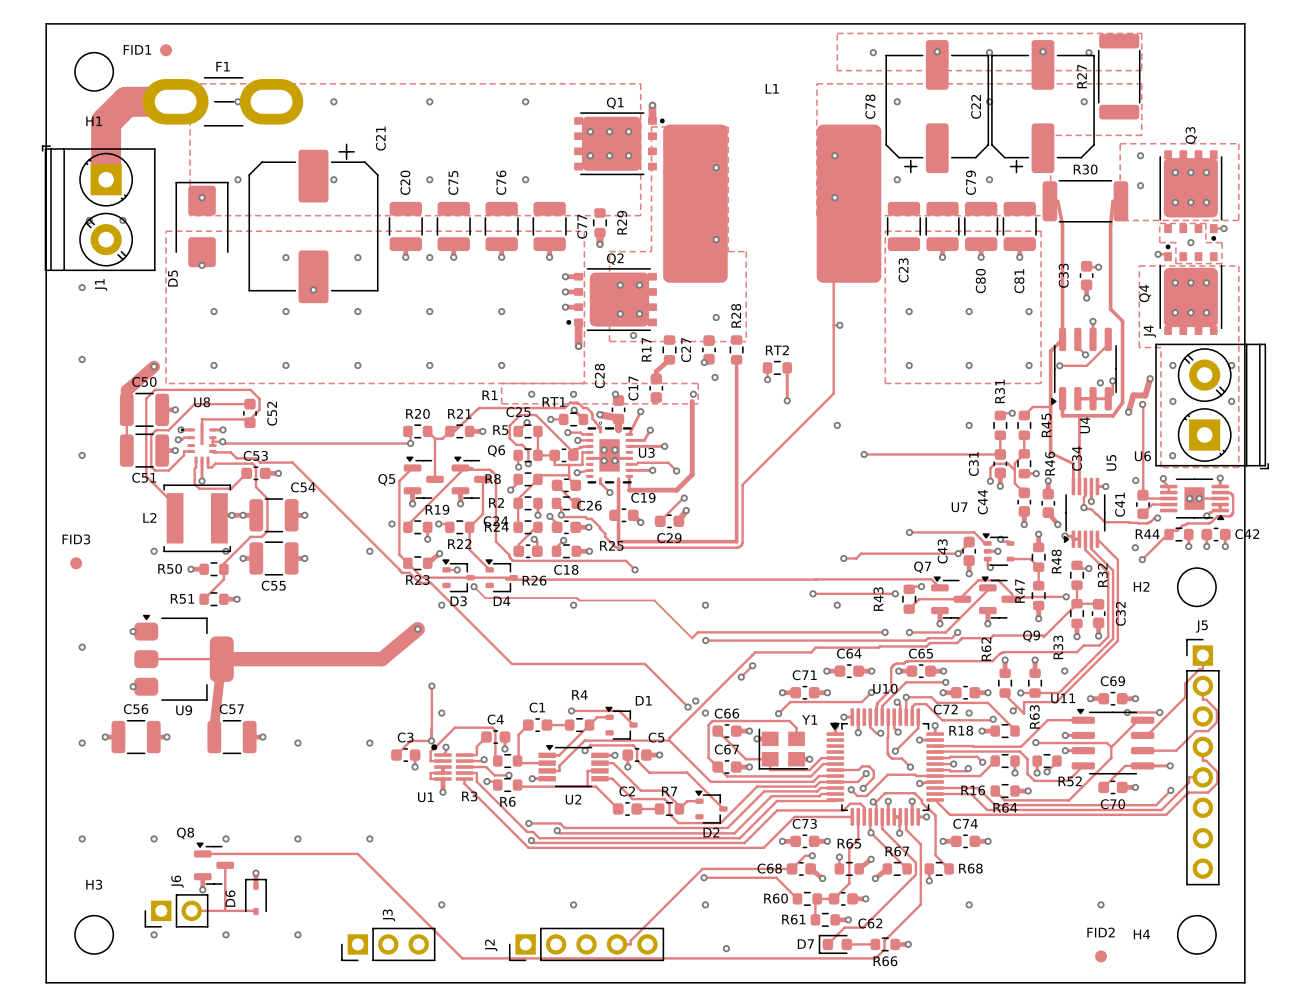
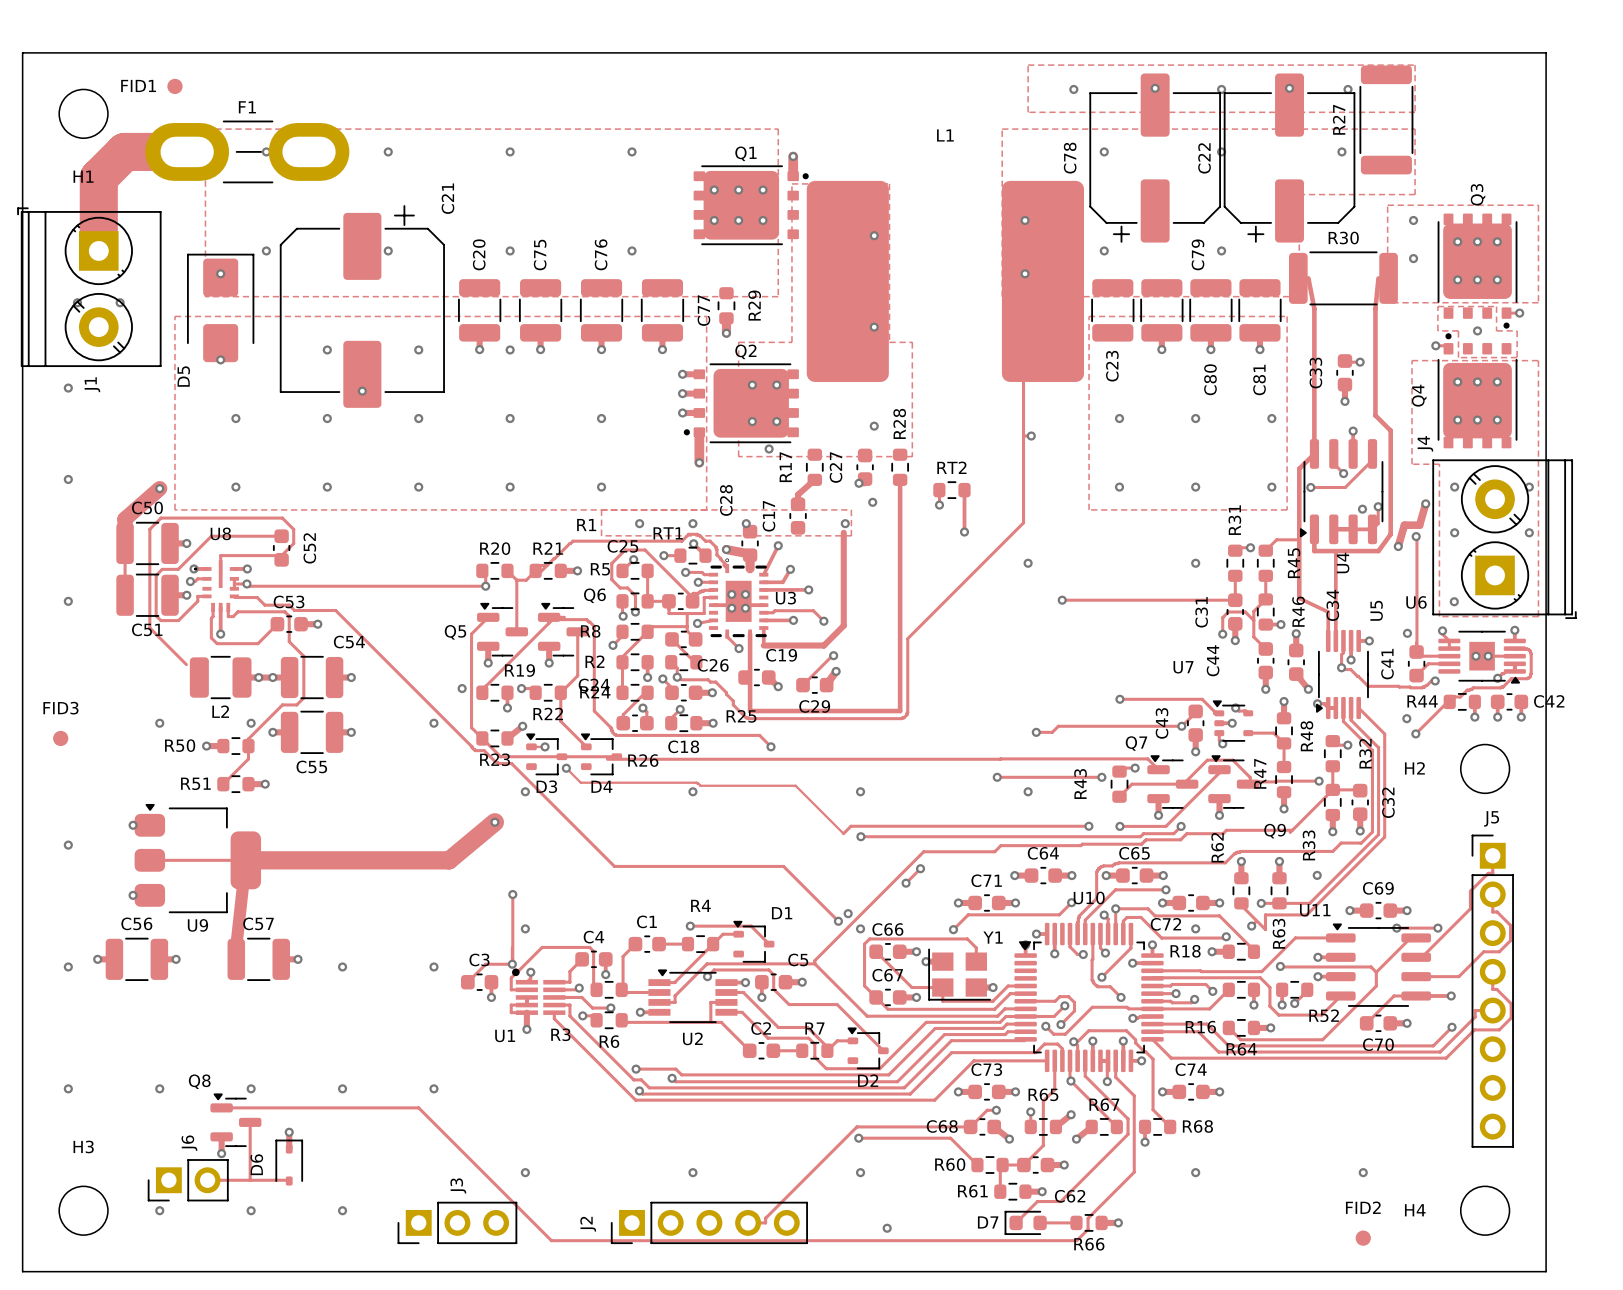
L2 footprint: [163, 484, 232, 553] -> [189, 655, 252, 700]
L2 name position: L2 (149, 517) -> L2 (220, 711)

